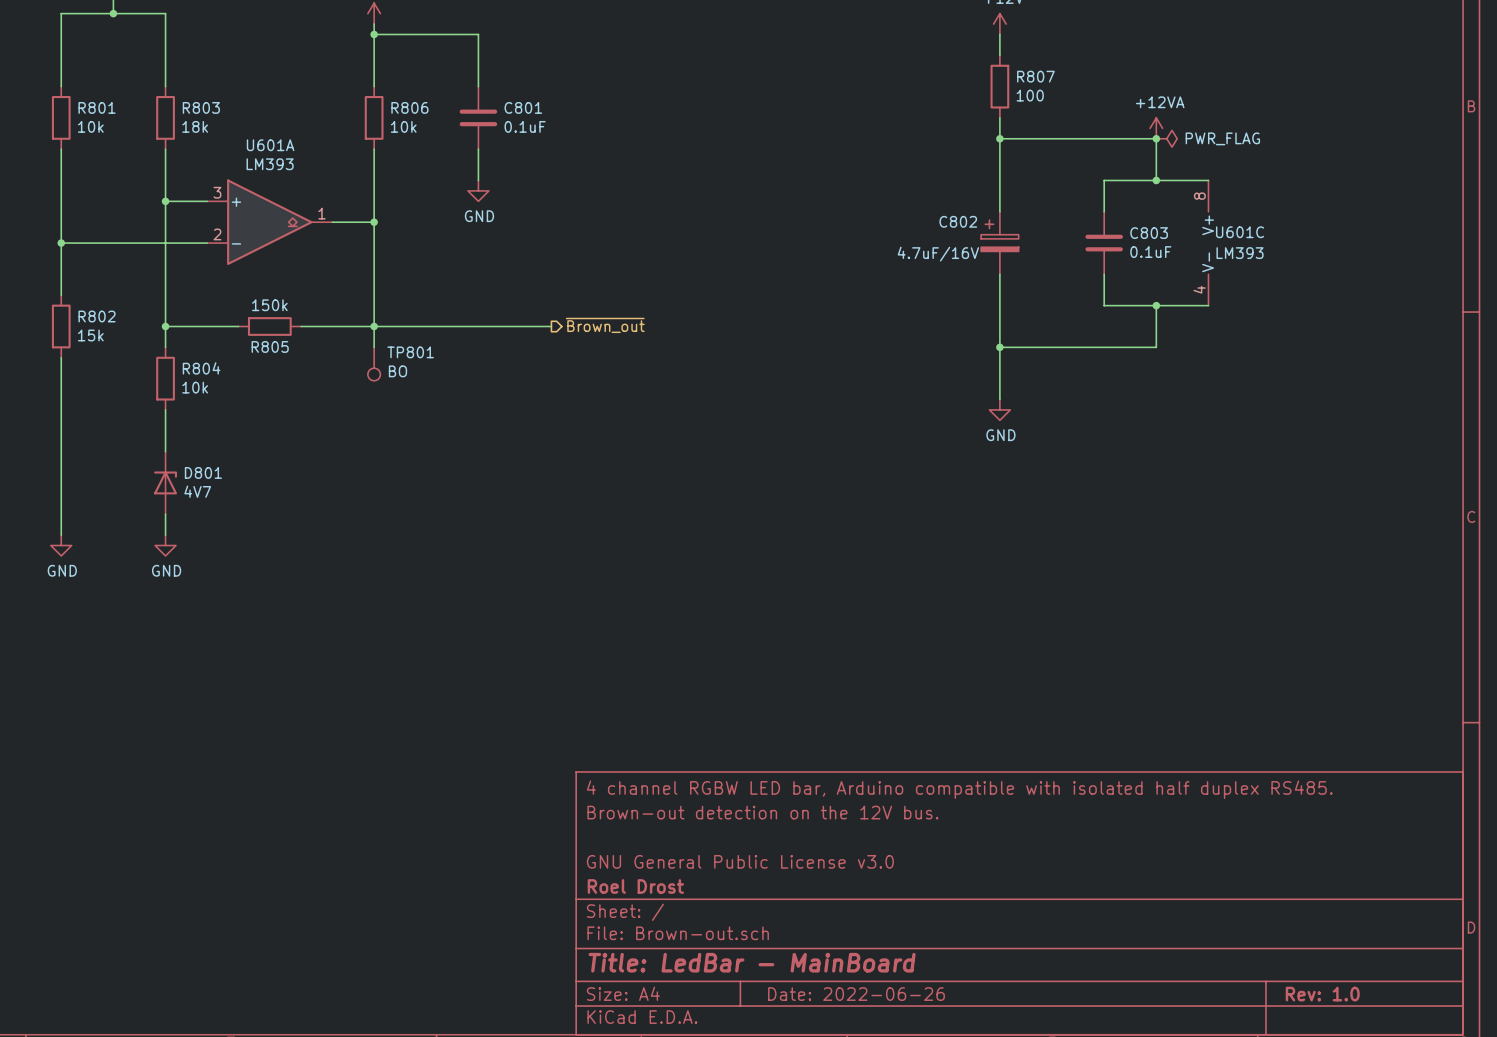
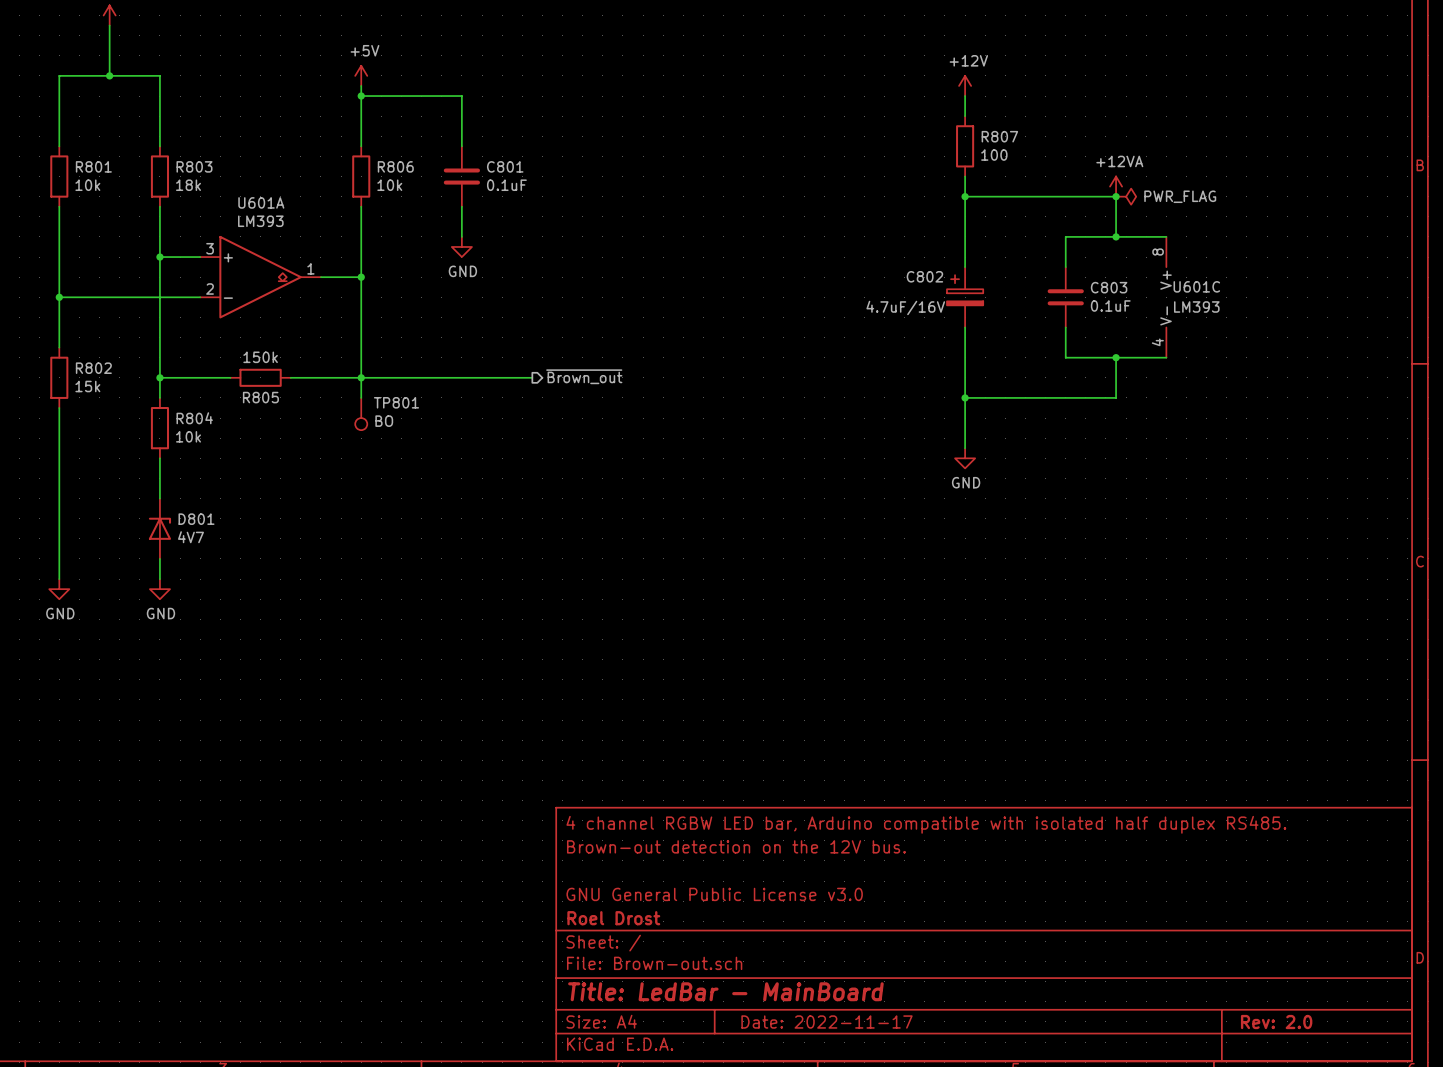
title block: Date: 2022-06-26 (856, 994) -> Date: 2022-11-17 (827, 1022)
title block: Rev: 1.0 (1322, 994) -> Rev: 2.0 (1276, 1022)

